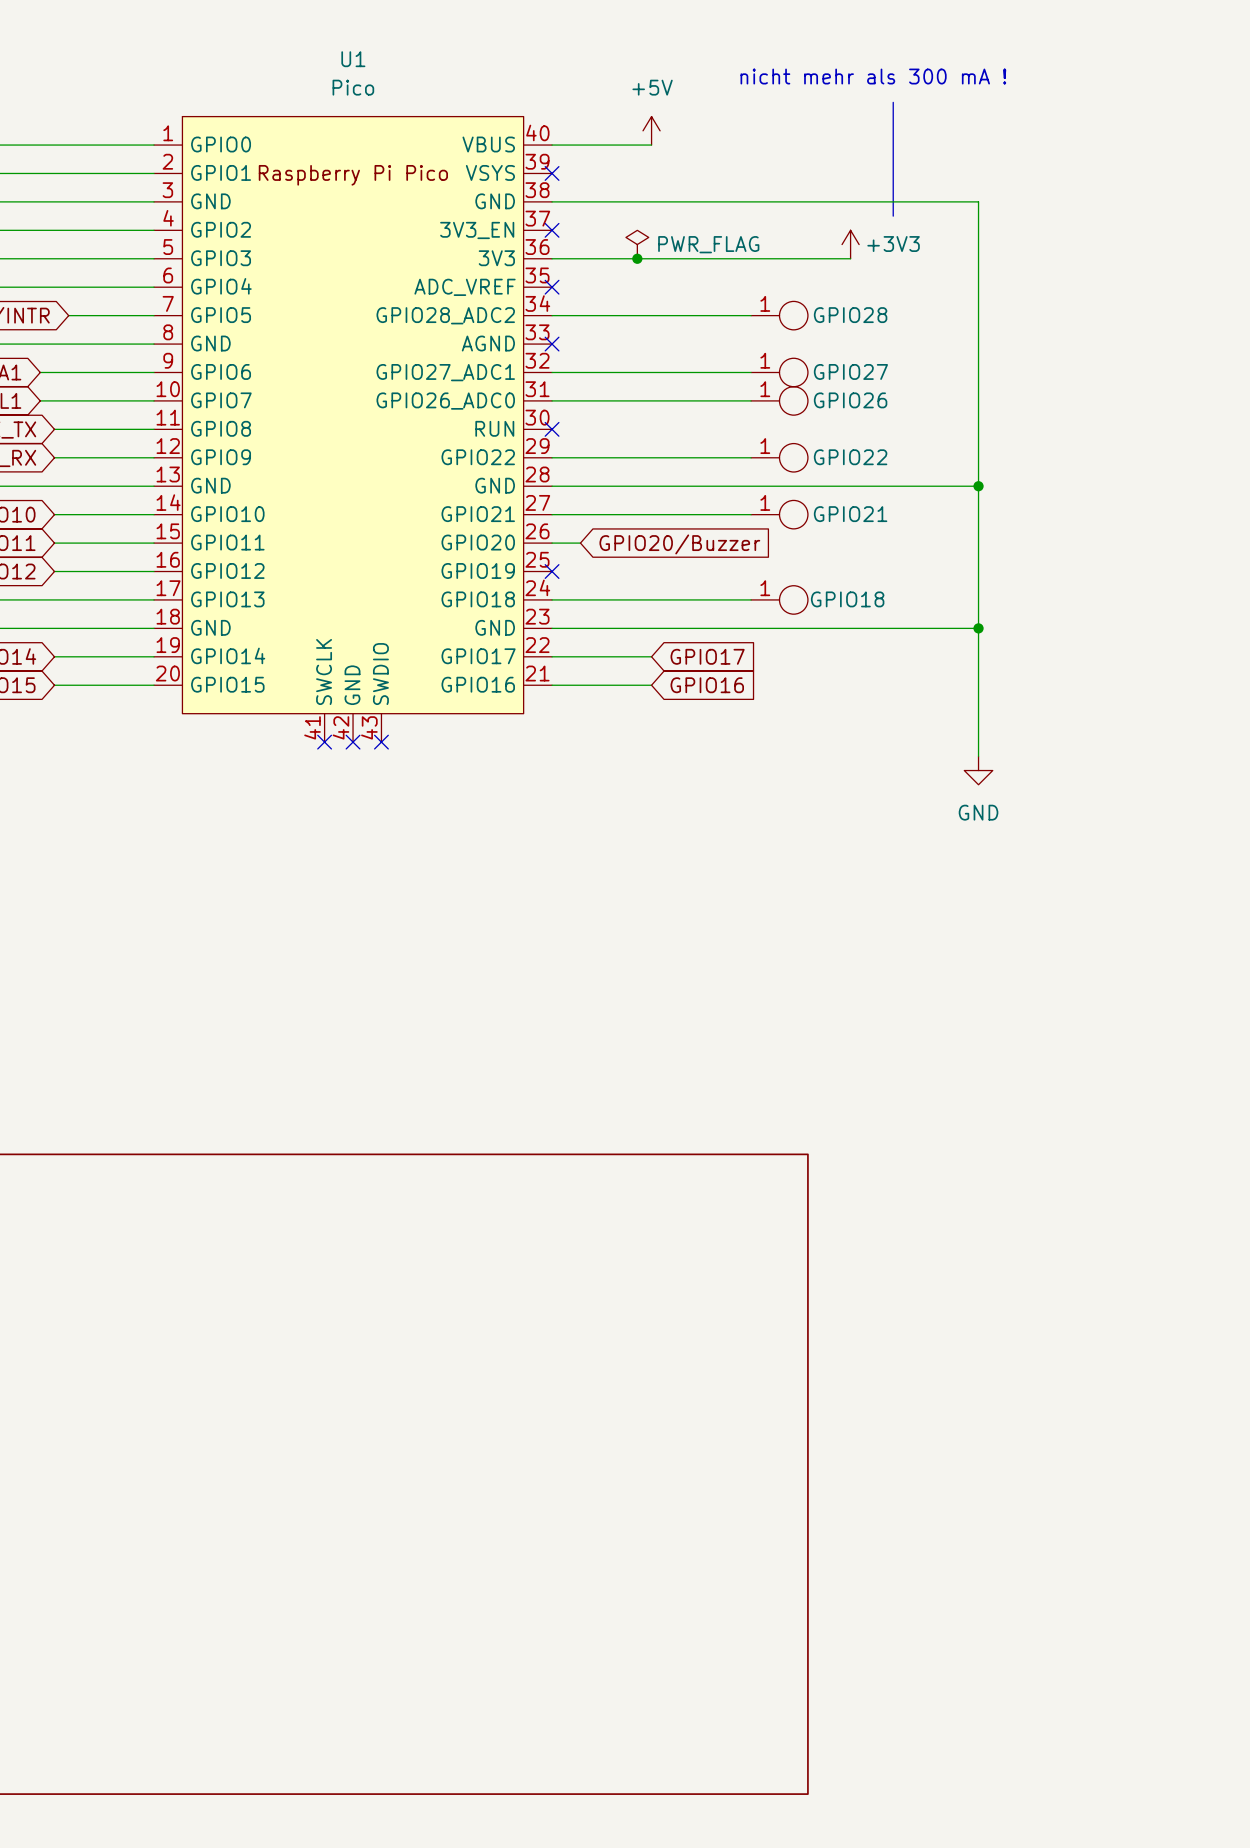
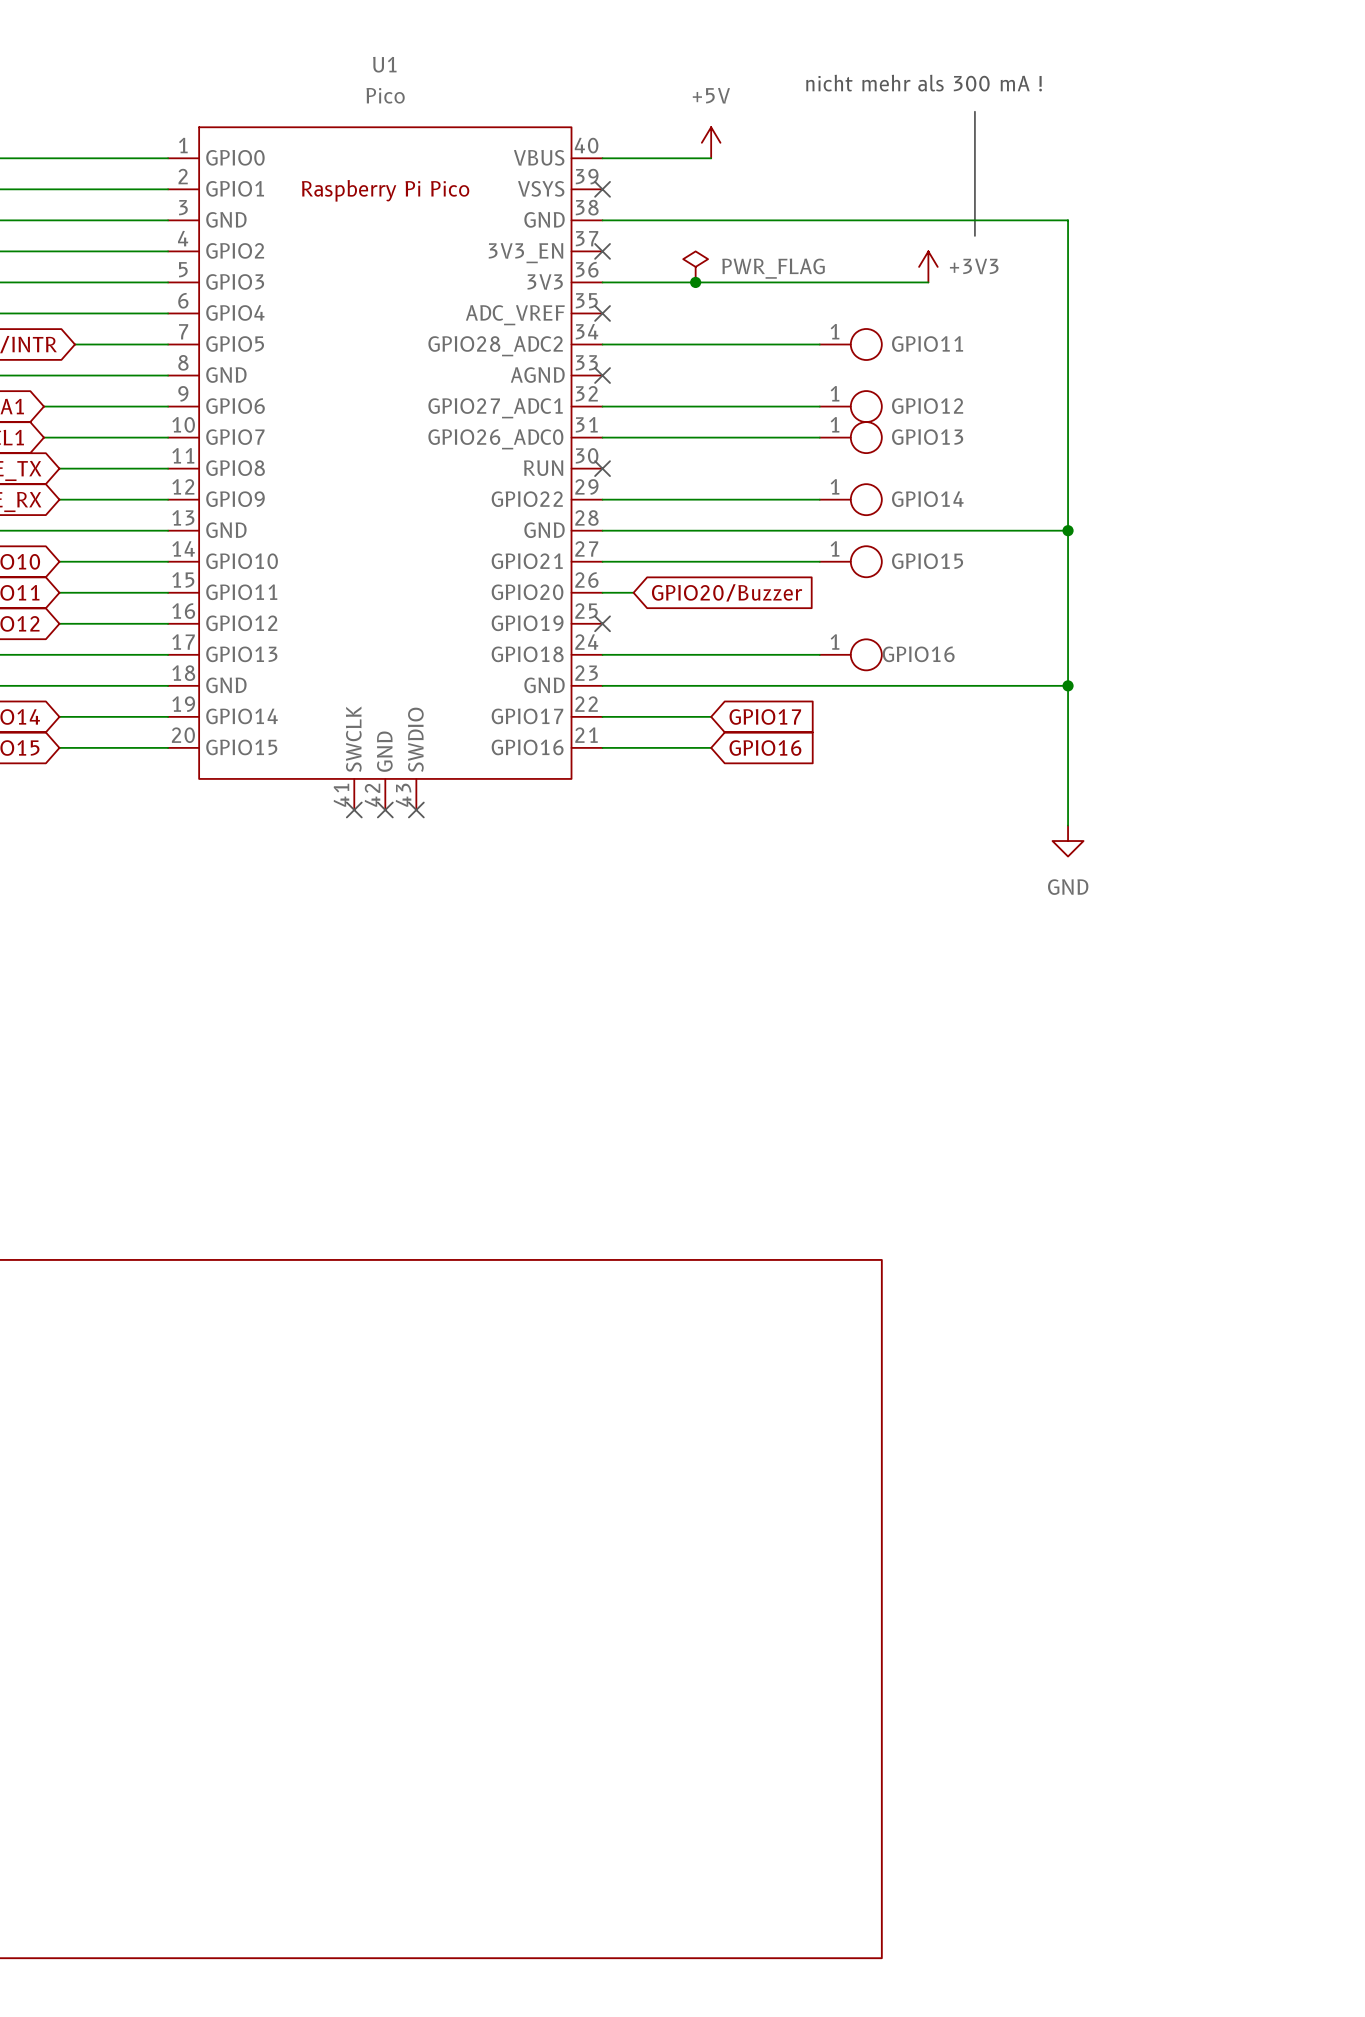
GPIO28 name: GPIO28 (850, 315) -> GPIO11 (927, 344)
GPIO27 name: GPIO27 (850, 371) -> GPIO12 (927, 406)
GPIO26 name: GPIO26 (850, 400) -> GPIO13 (927, 437)
GPIO22 name: GPIO22 (850, 457) -> GPIO14 (927, 499)
GPIO21 name: GPIO21 (850, 514) -> GPIO15 (927, 561)
GPIO18 name: GPIO18 (847, 599) -> GPIO16 (918, 654)

